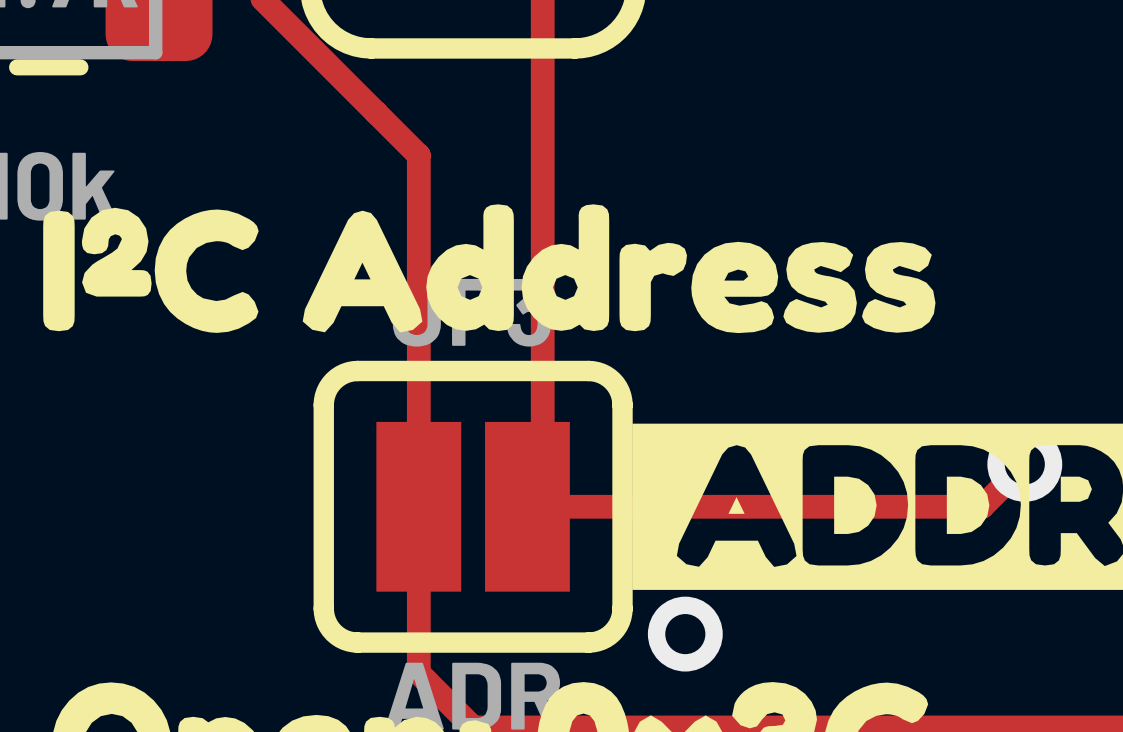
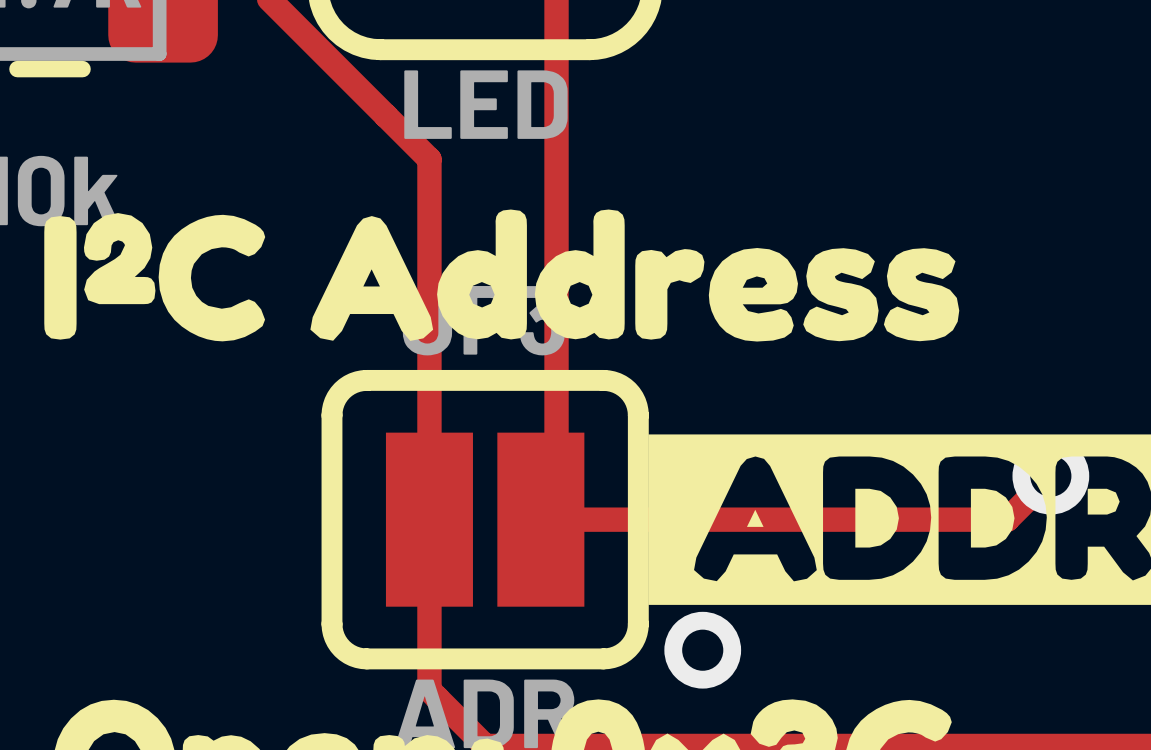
part value: none -> LED (485, 104)

